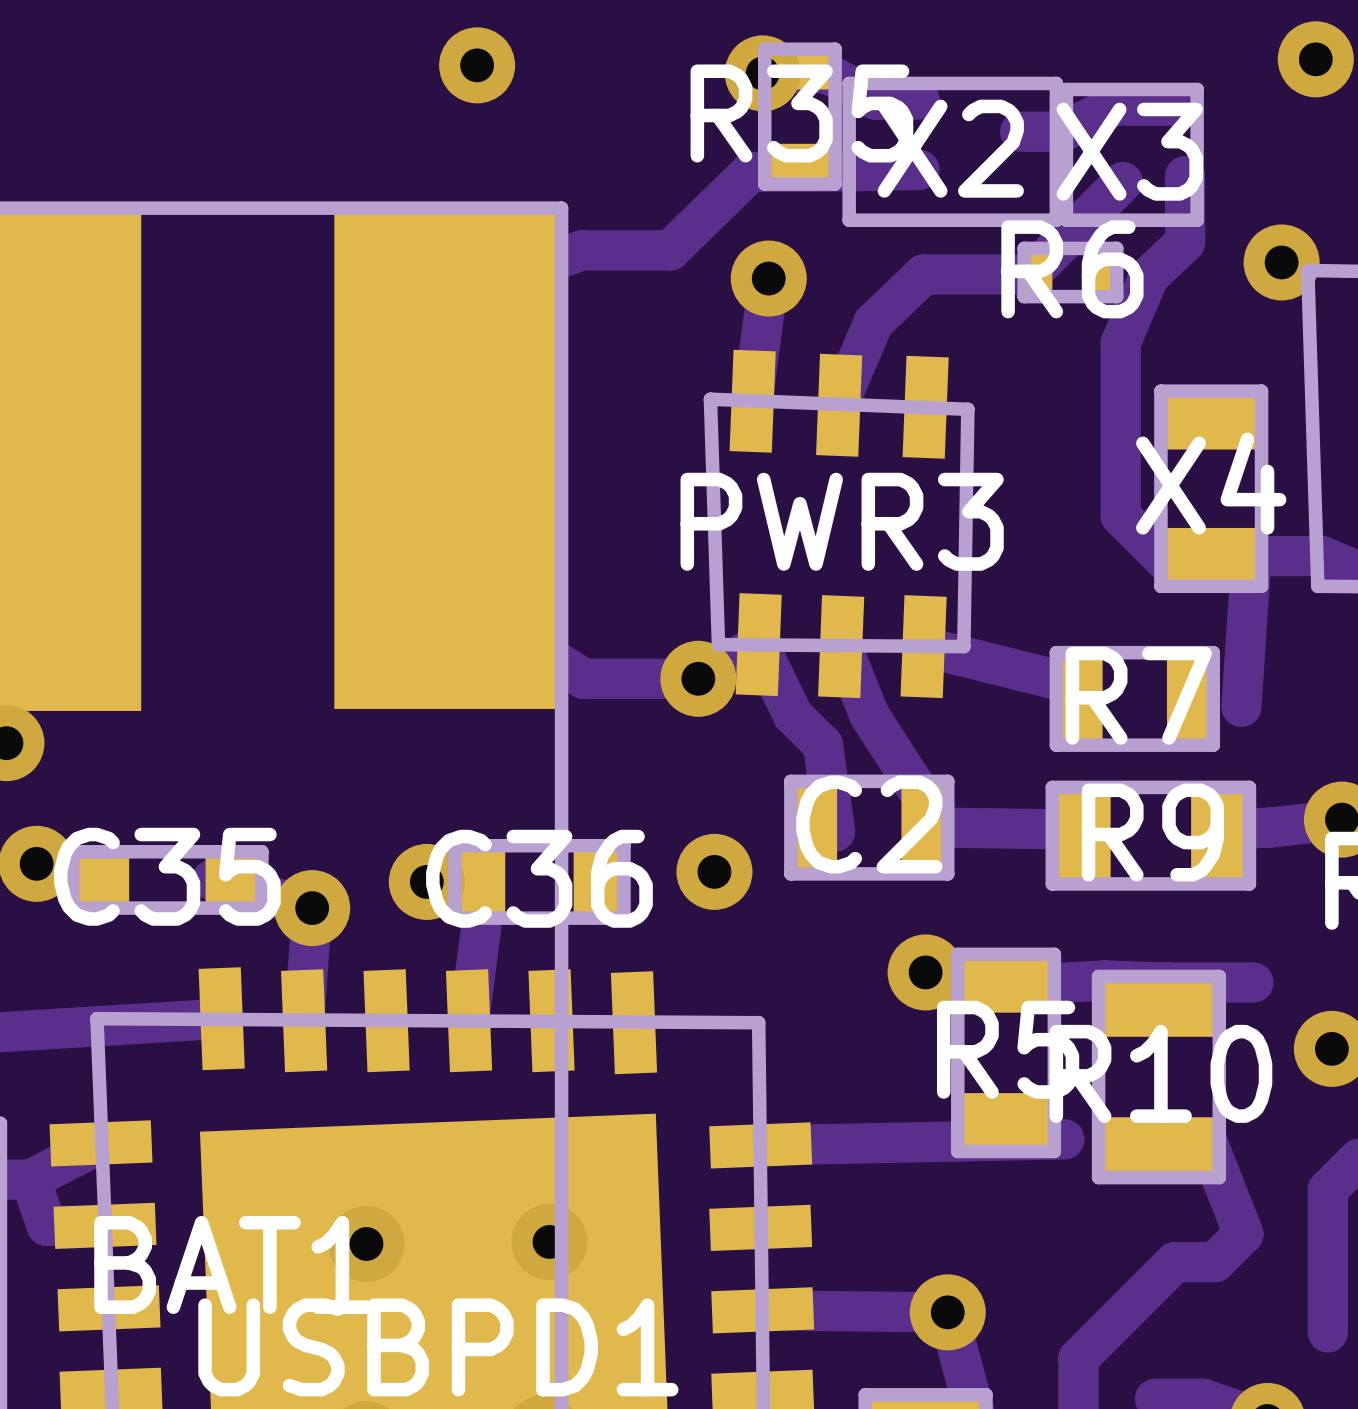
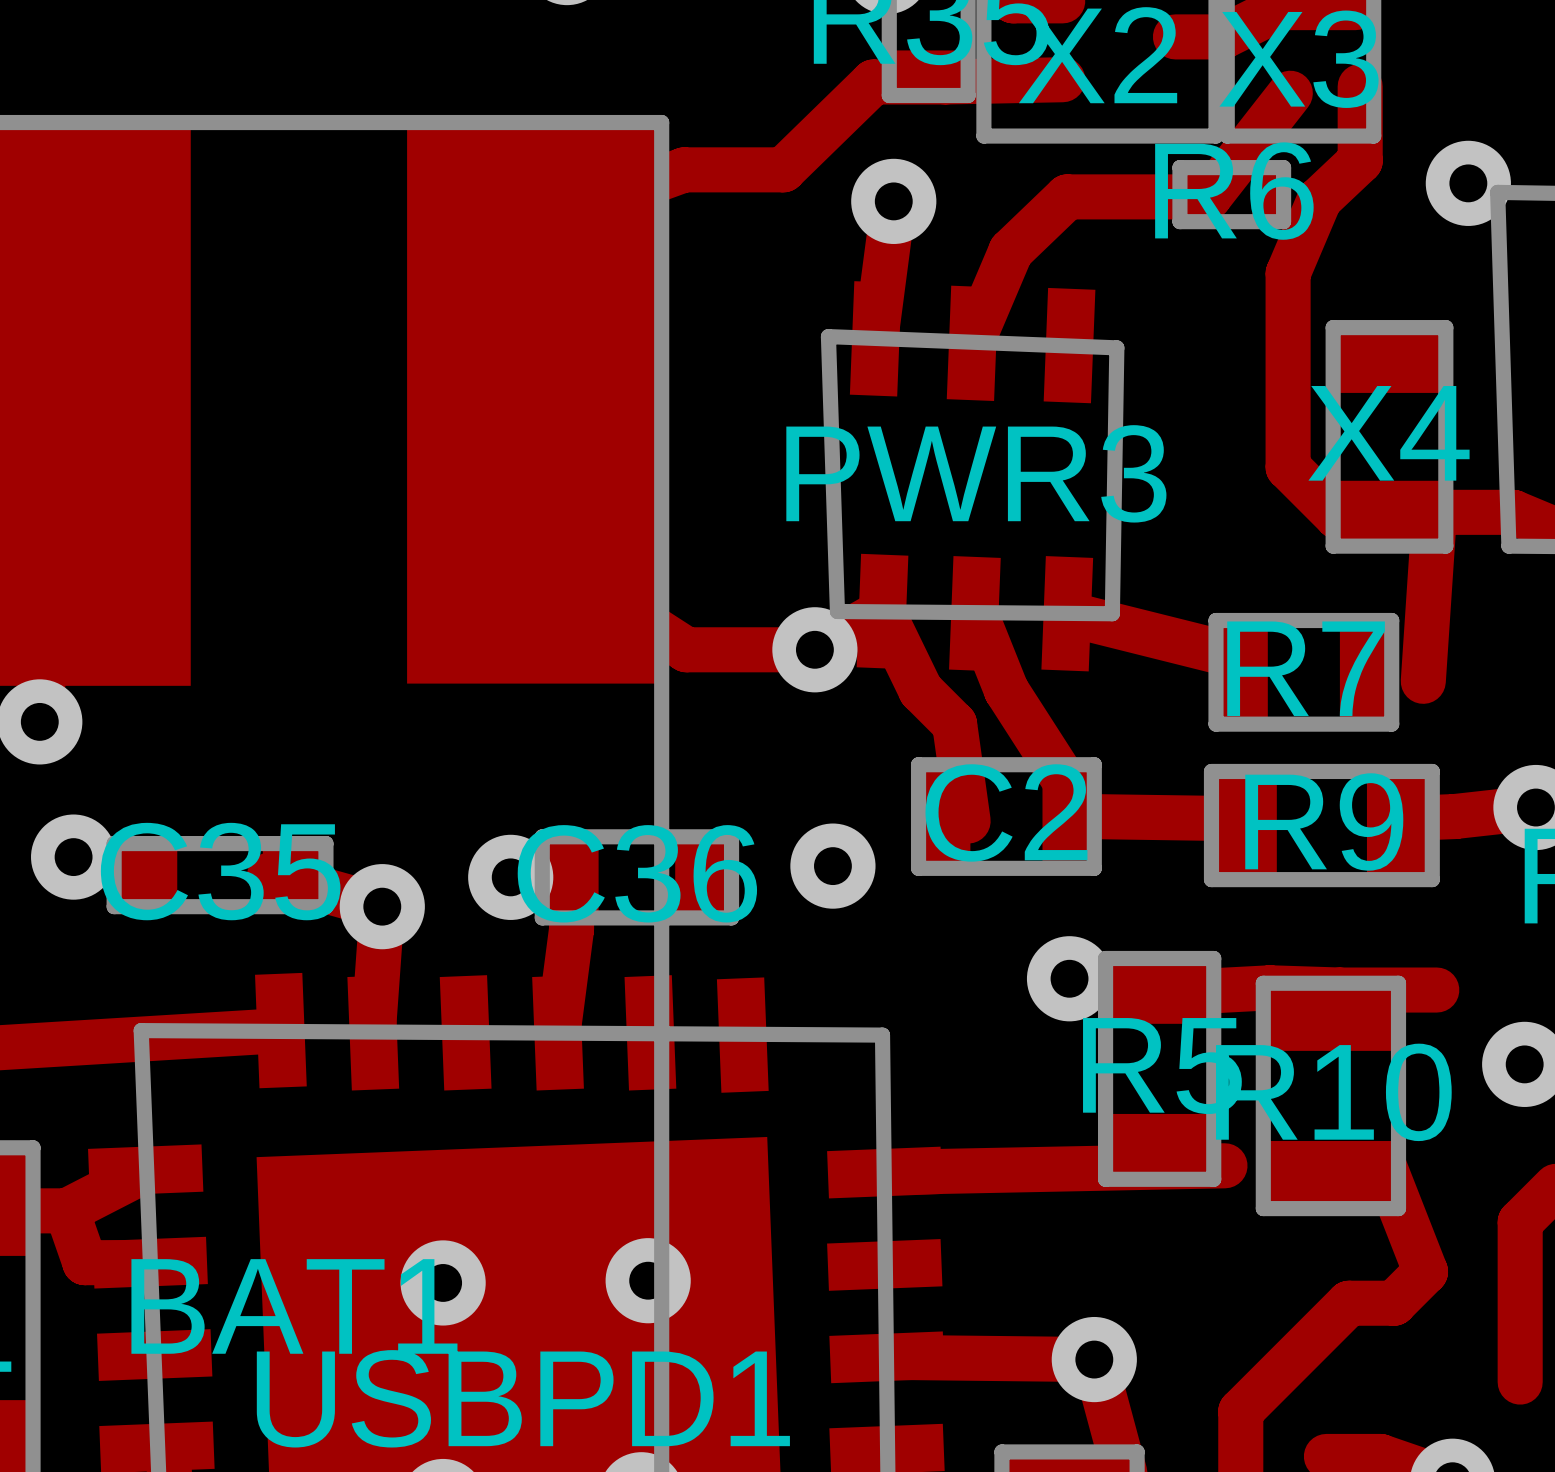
track: (1122, 182) (1030, 274) -> (1290, 93) (1209, 196) (1186, 196)

